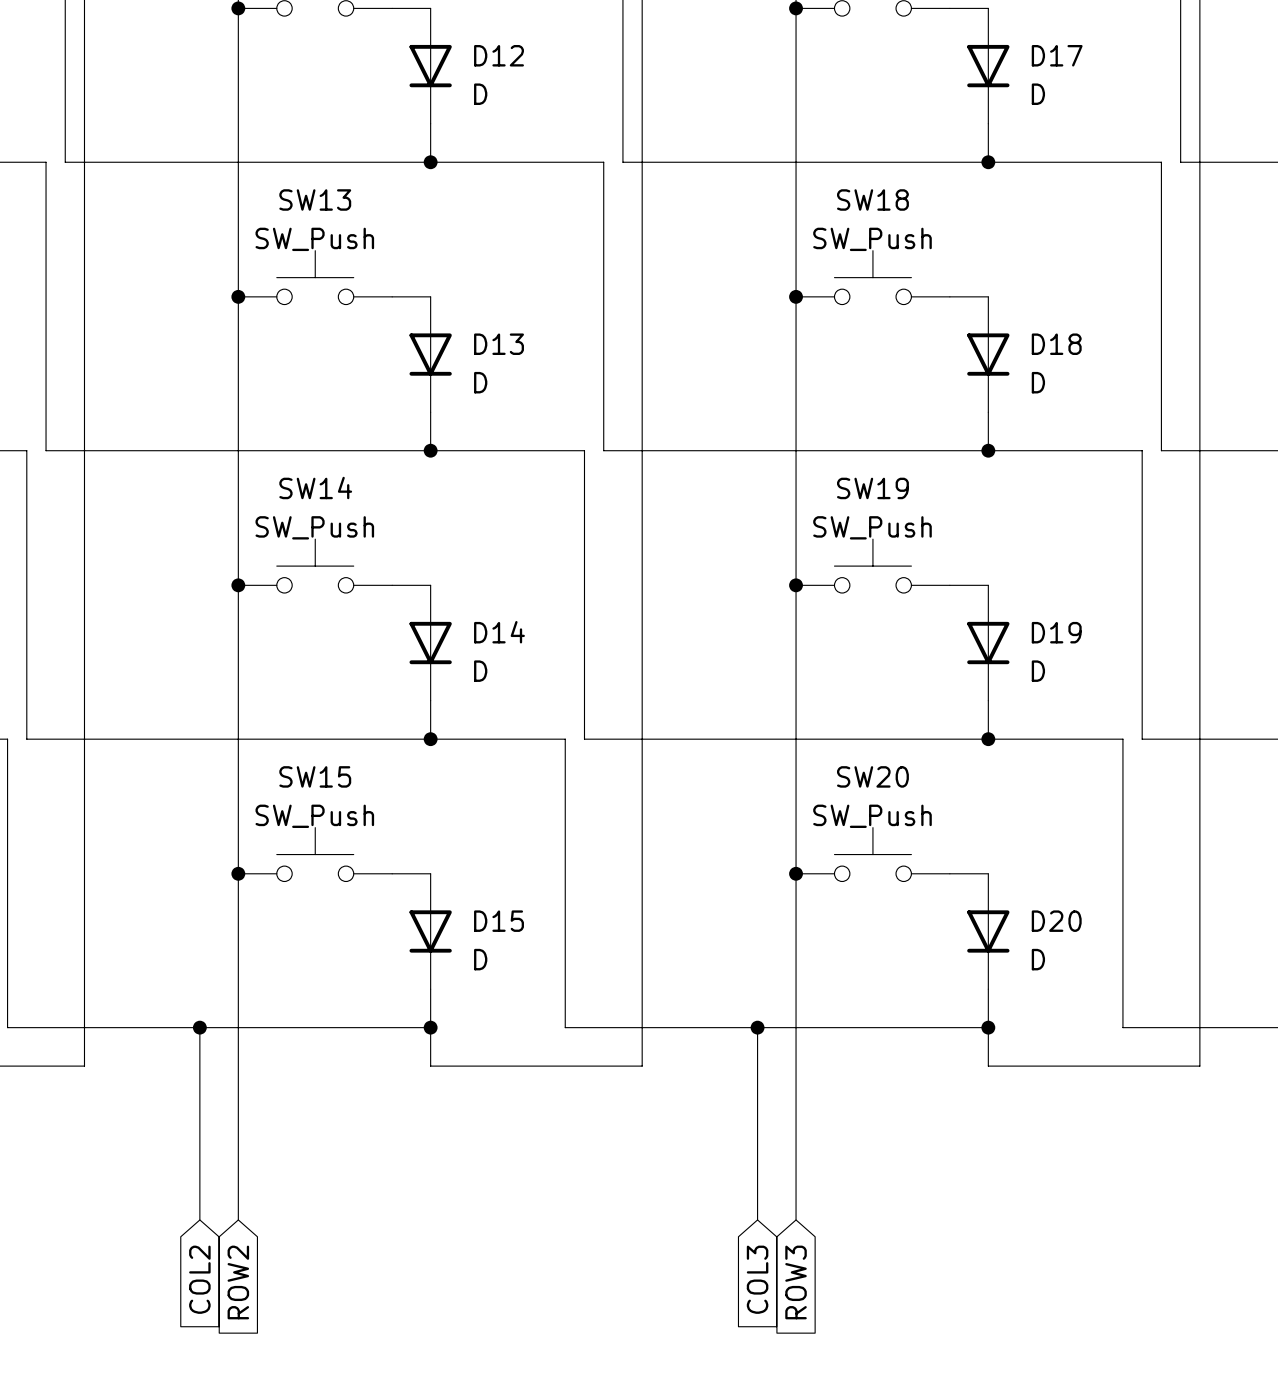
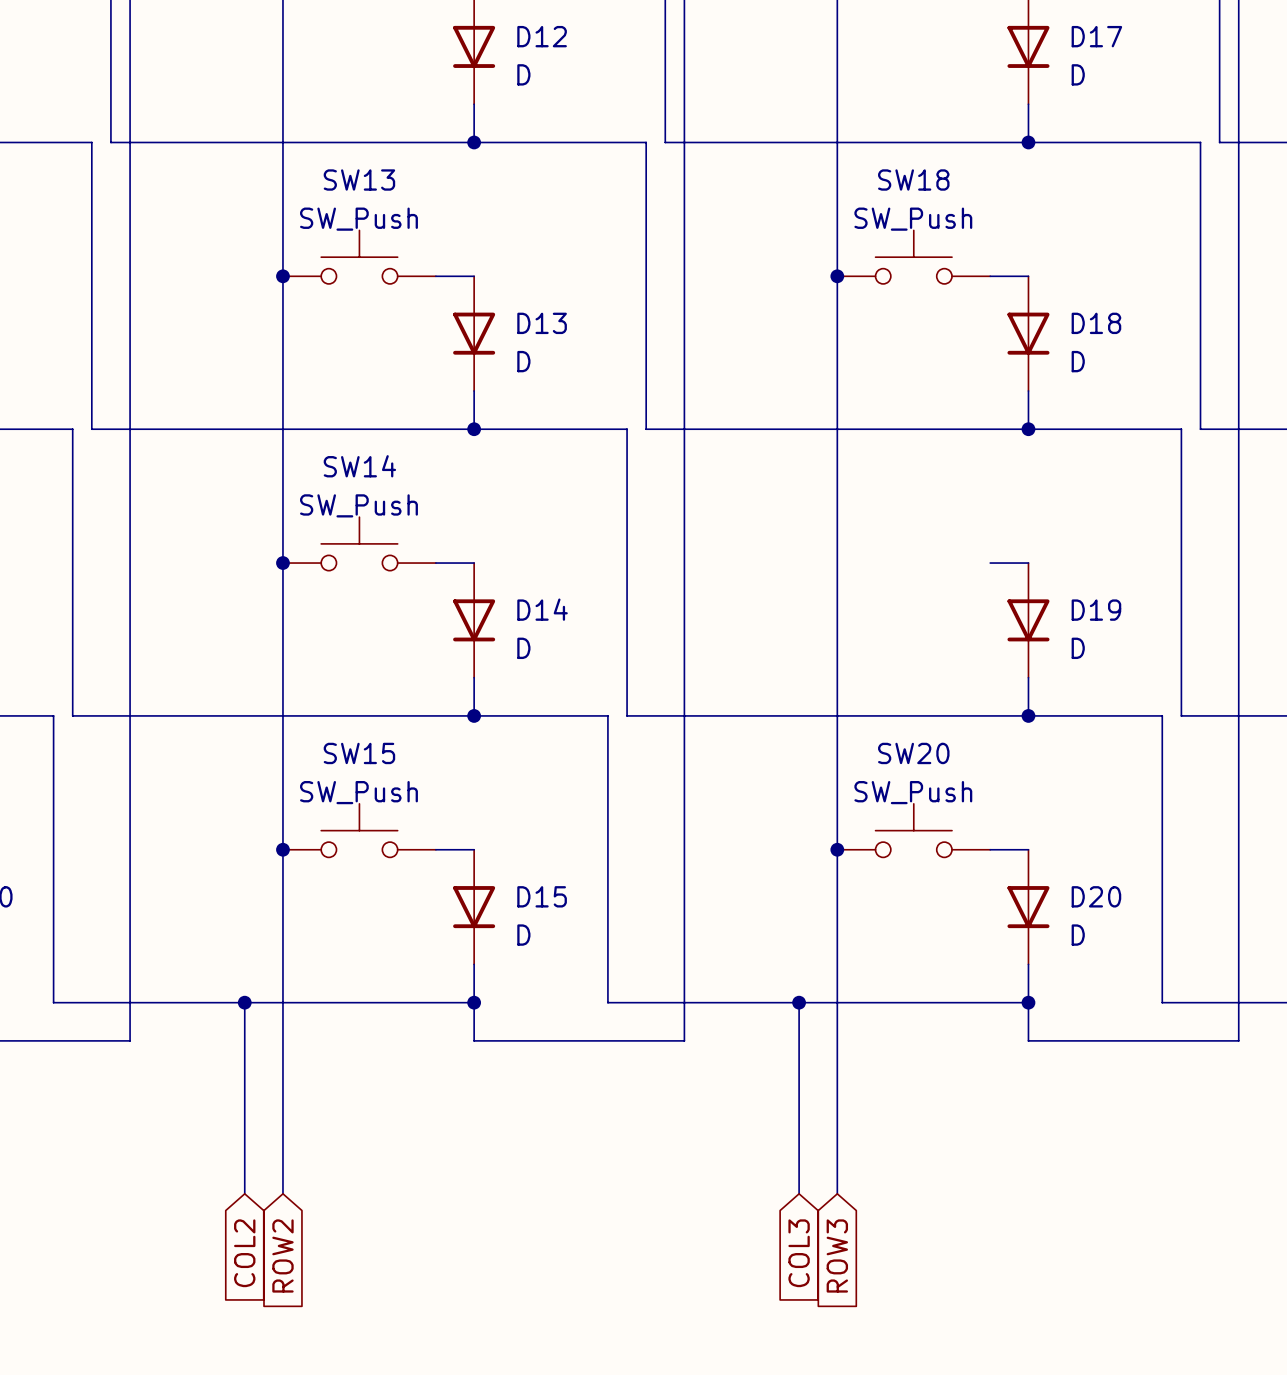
SW19: SW_Push (872, 566) -> none
junction: (796, 585) -> none

